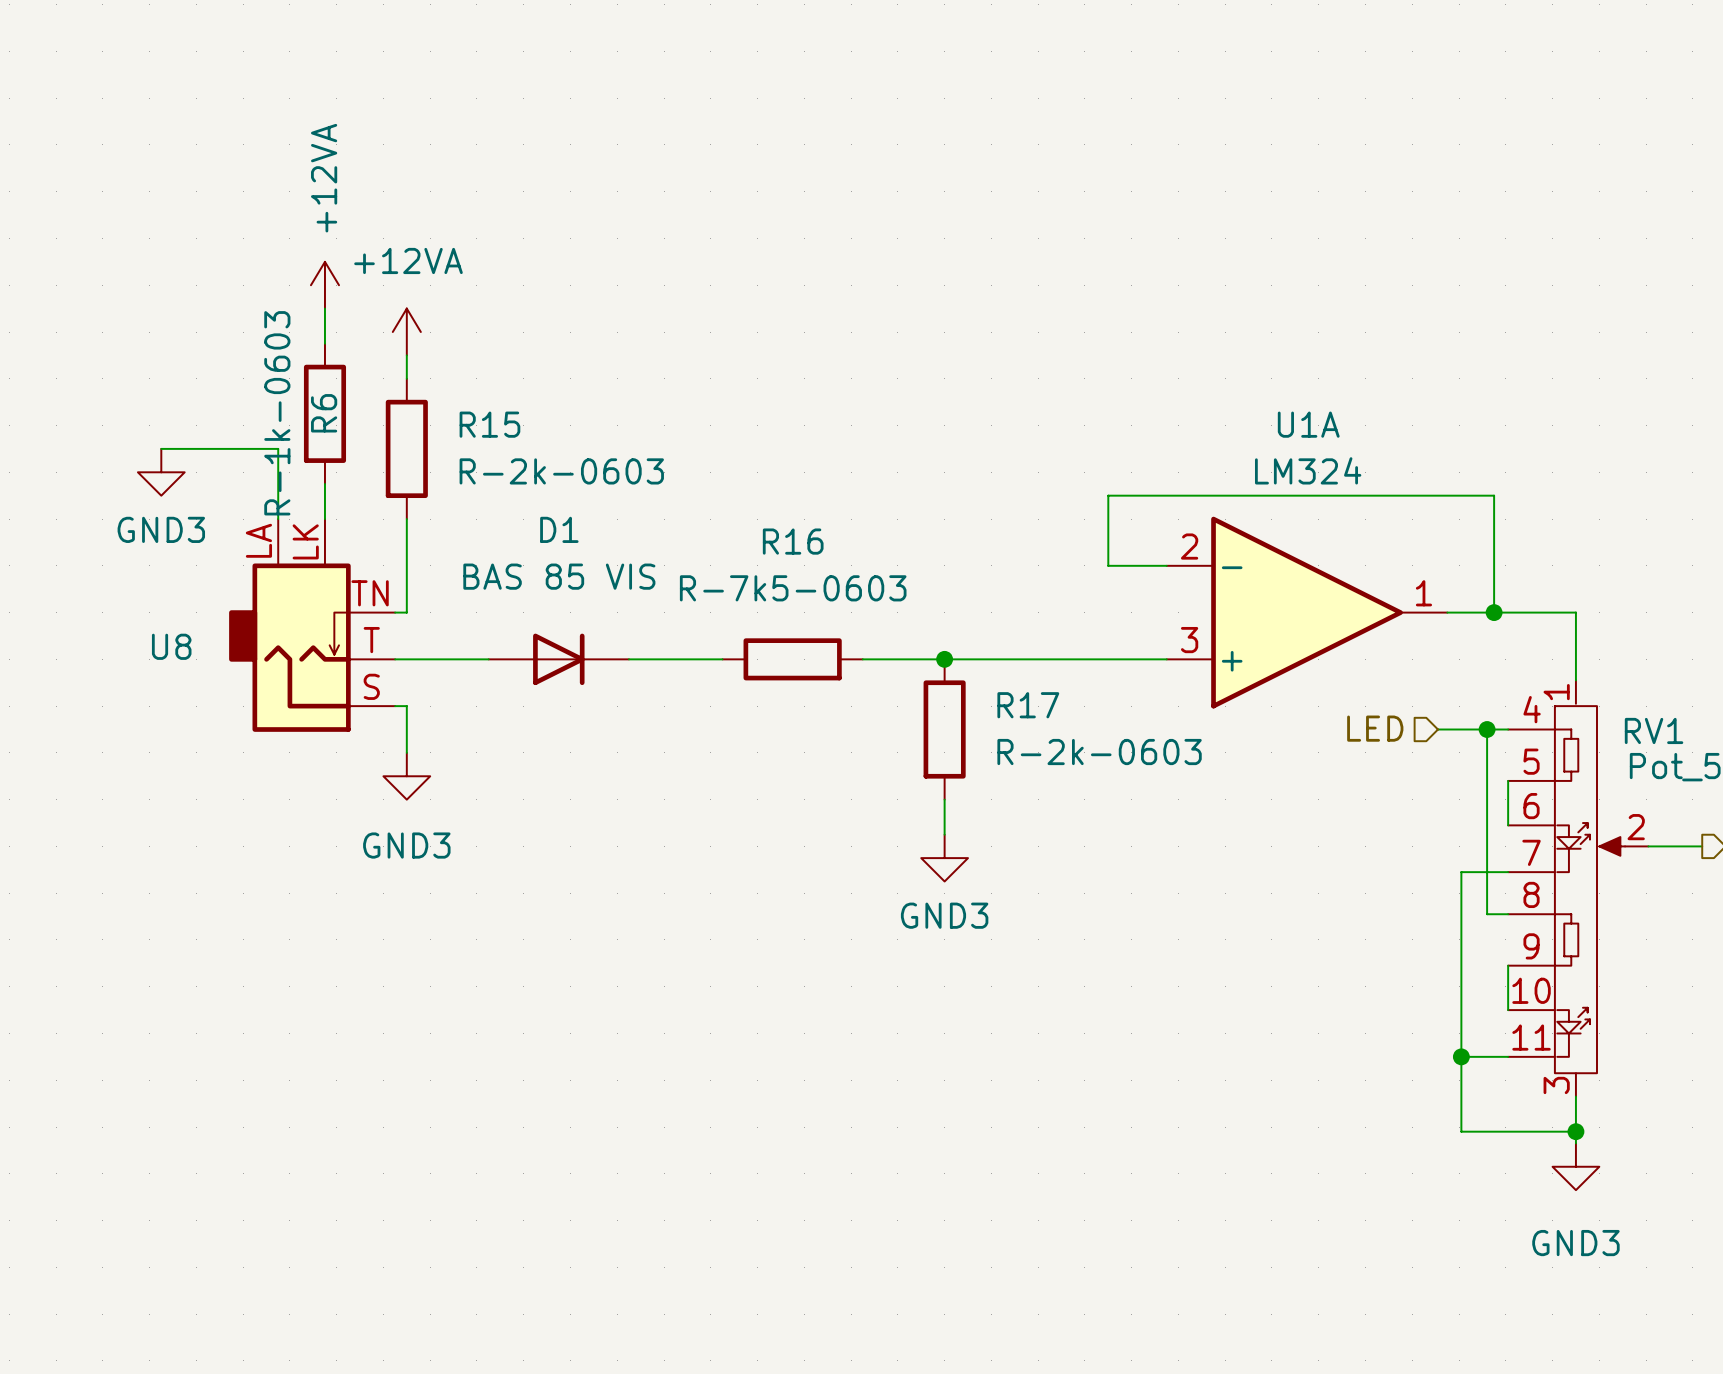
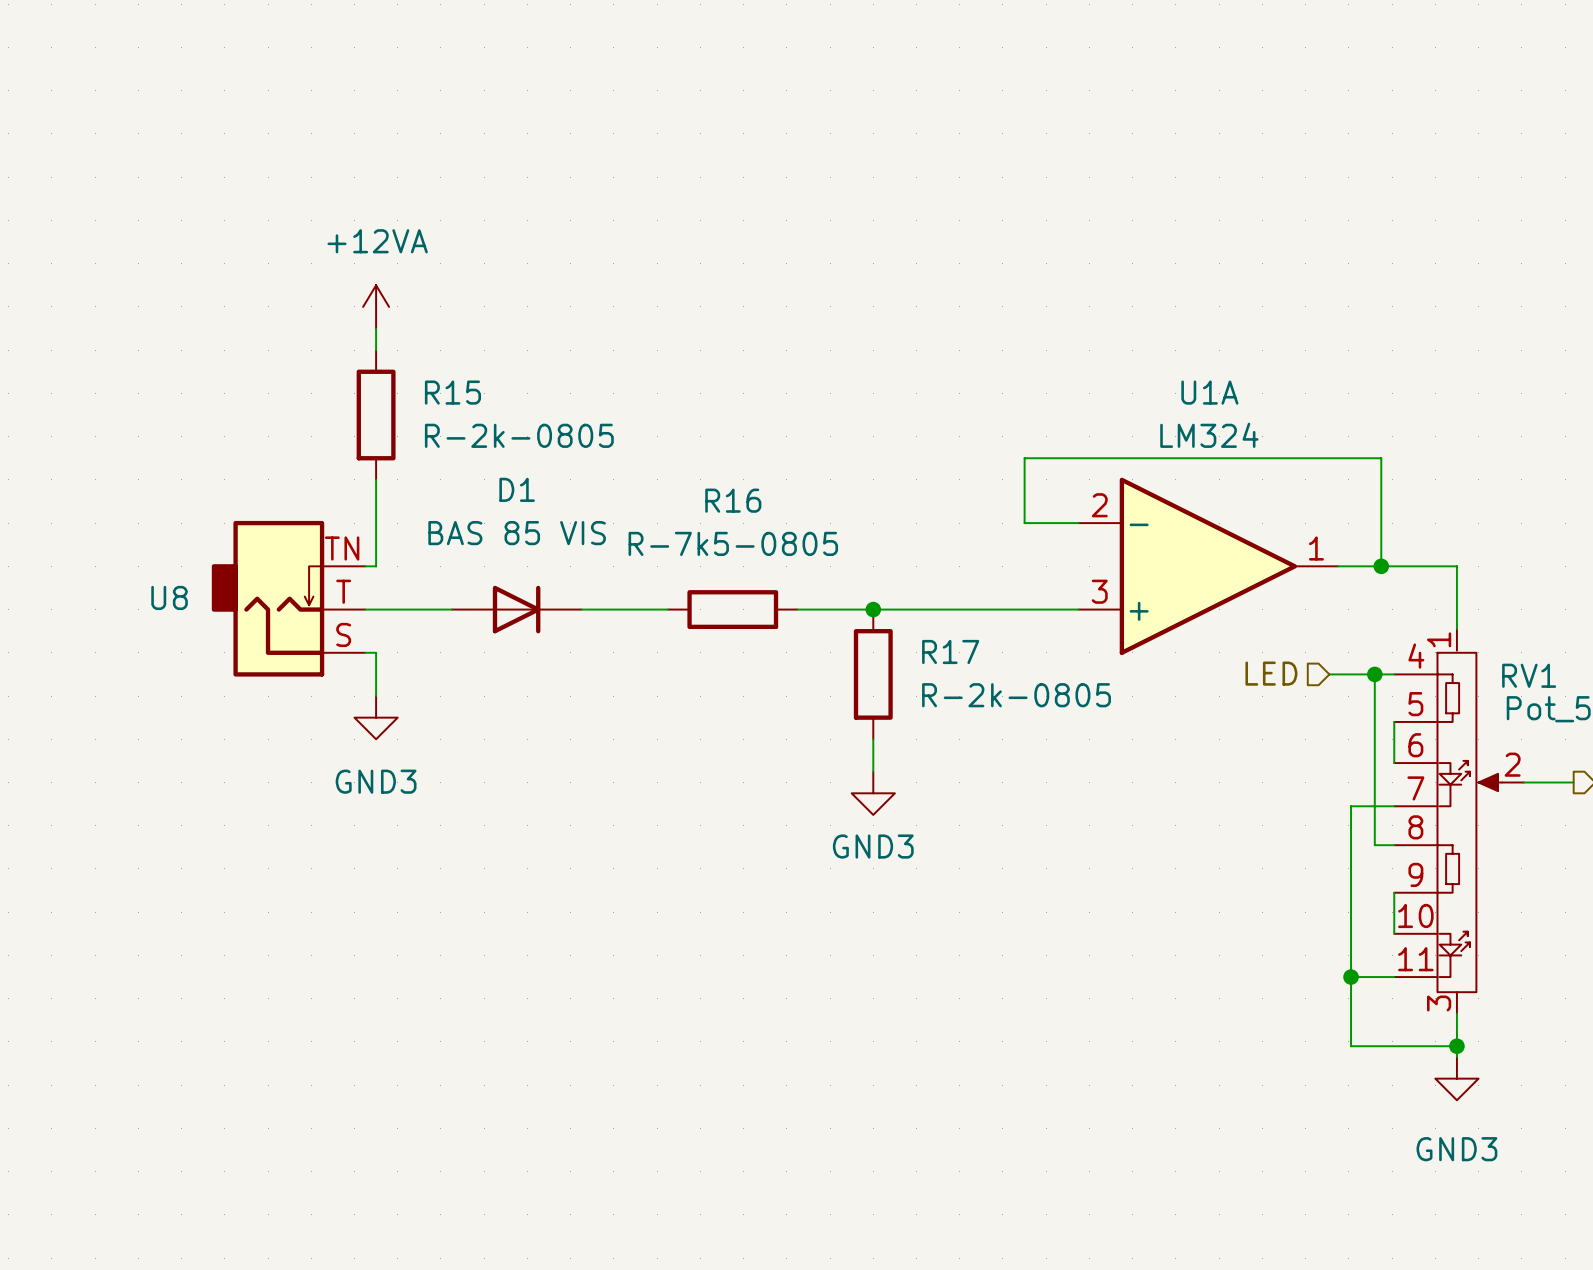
power symbol: +12VA (324, 285) -> none
wire: (324, 308) (324, 343) -> none
R6: R-1k-0603 (324, 413) -> none
wire: (161, 448) (278, 448) (278, 519) -> none
R15 value: R-2k-0603 (561, 471) -> R-2k-0805 (519, 435)
power symbol: GND3 (161, 472) -> none
wire: (324, 483) (324, 519) -> none
U8 symbol: [229, 519, 396, 732] -> [211, 520, 366, 677]
R16 value: R-7k5-0603 (793, 588) -> R-7k5-0805 (733, 543)
R17 value: R-2k-0603 (1099, 752) -> R-2k-0805 (1016, 695)

